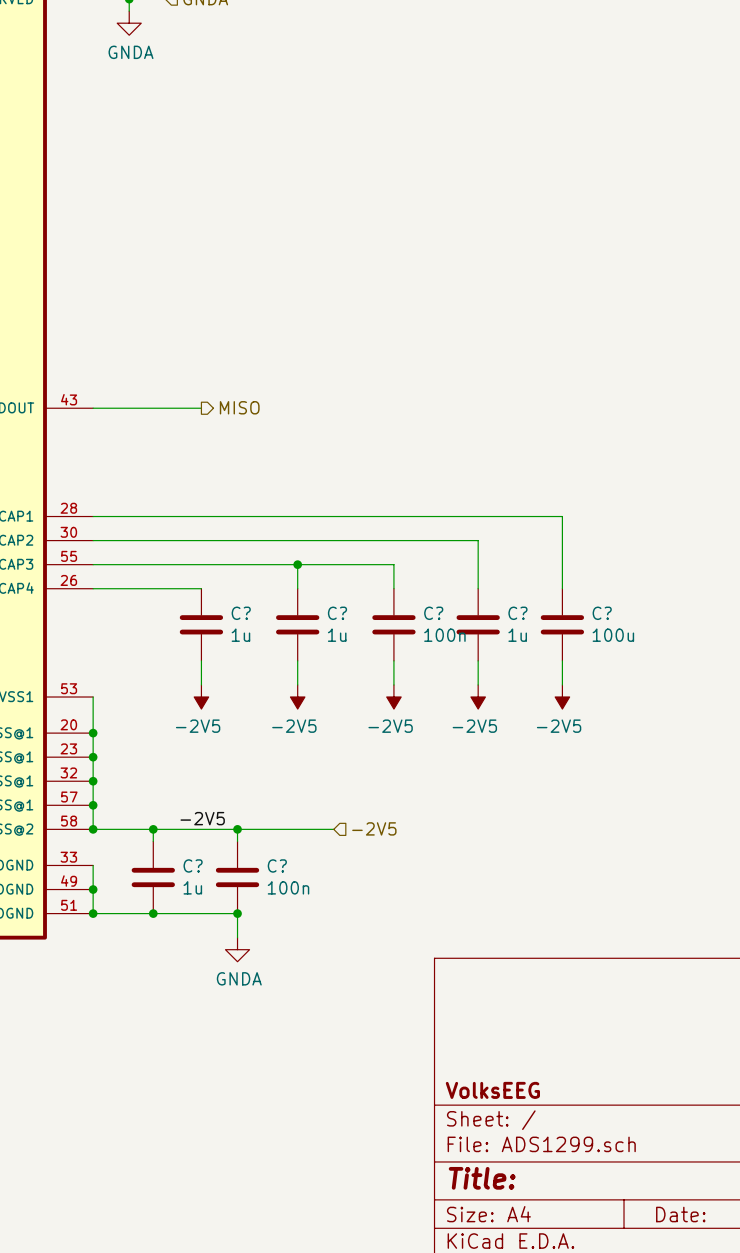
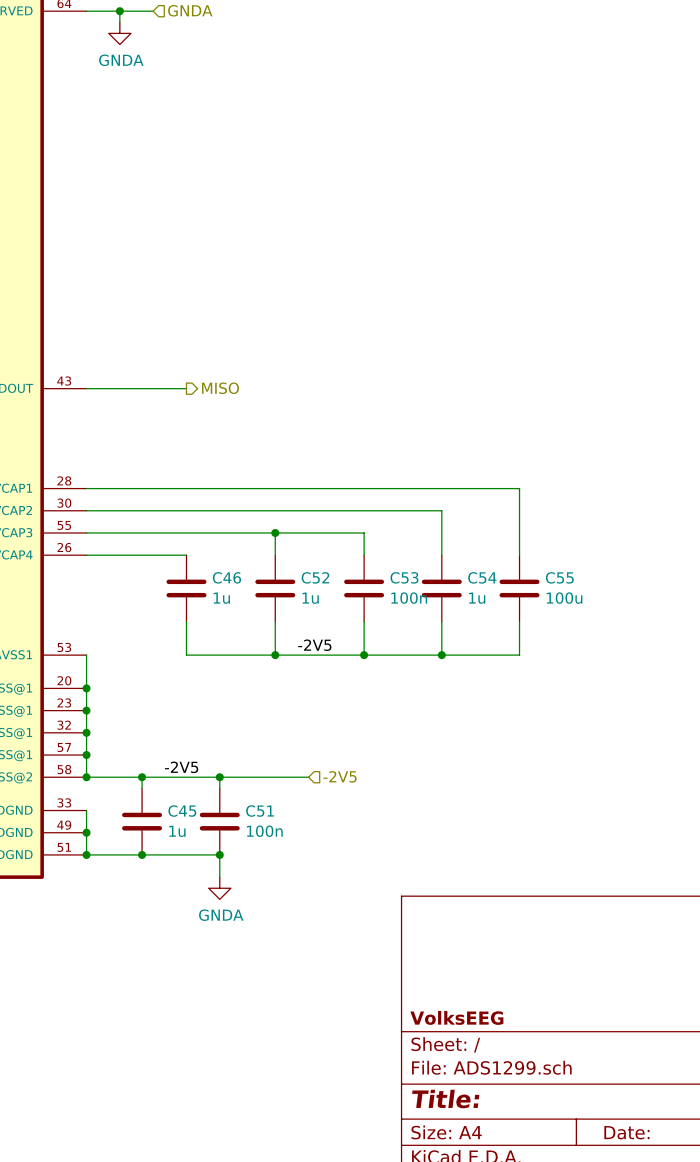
C? name: C? (241, 613) -> C46 (226, 577)
C? name: C? (337, 613) -> C52 (315, 577)
C? name: C? (433, 613) -> C53 (404, 577)
C? name: C? (517, 613) -> C54 (482, 577)
C? name: C? (602, 613) -> C55 (559, 577)
wire: none -> (186, 644) (186, 655) (519, 655) (519, 644)
label: none -> -2V5 (314, 645)
power symbol: -2V5 (201, 697) -> none
power symbol: -2V5 (297, 697) -> none
junction: none -> (275, 655)
power symbol: -2V5 (393, 697) -> none
junction: none -> (364, 655)
power symbol: -2V5 (478, 697) -> none
junction: none -> (441, 655)
power symbol: -2V5 (562, 697) -> none
C? name: C? (193, 865) -> C45 (182, 811)
C? name: C? (277, 865) -> C51 (260, 811)

